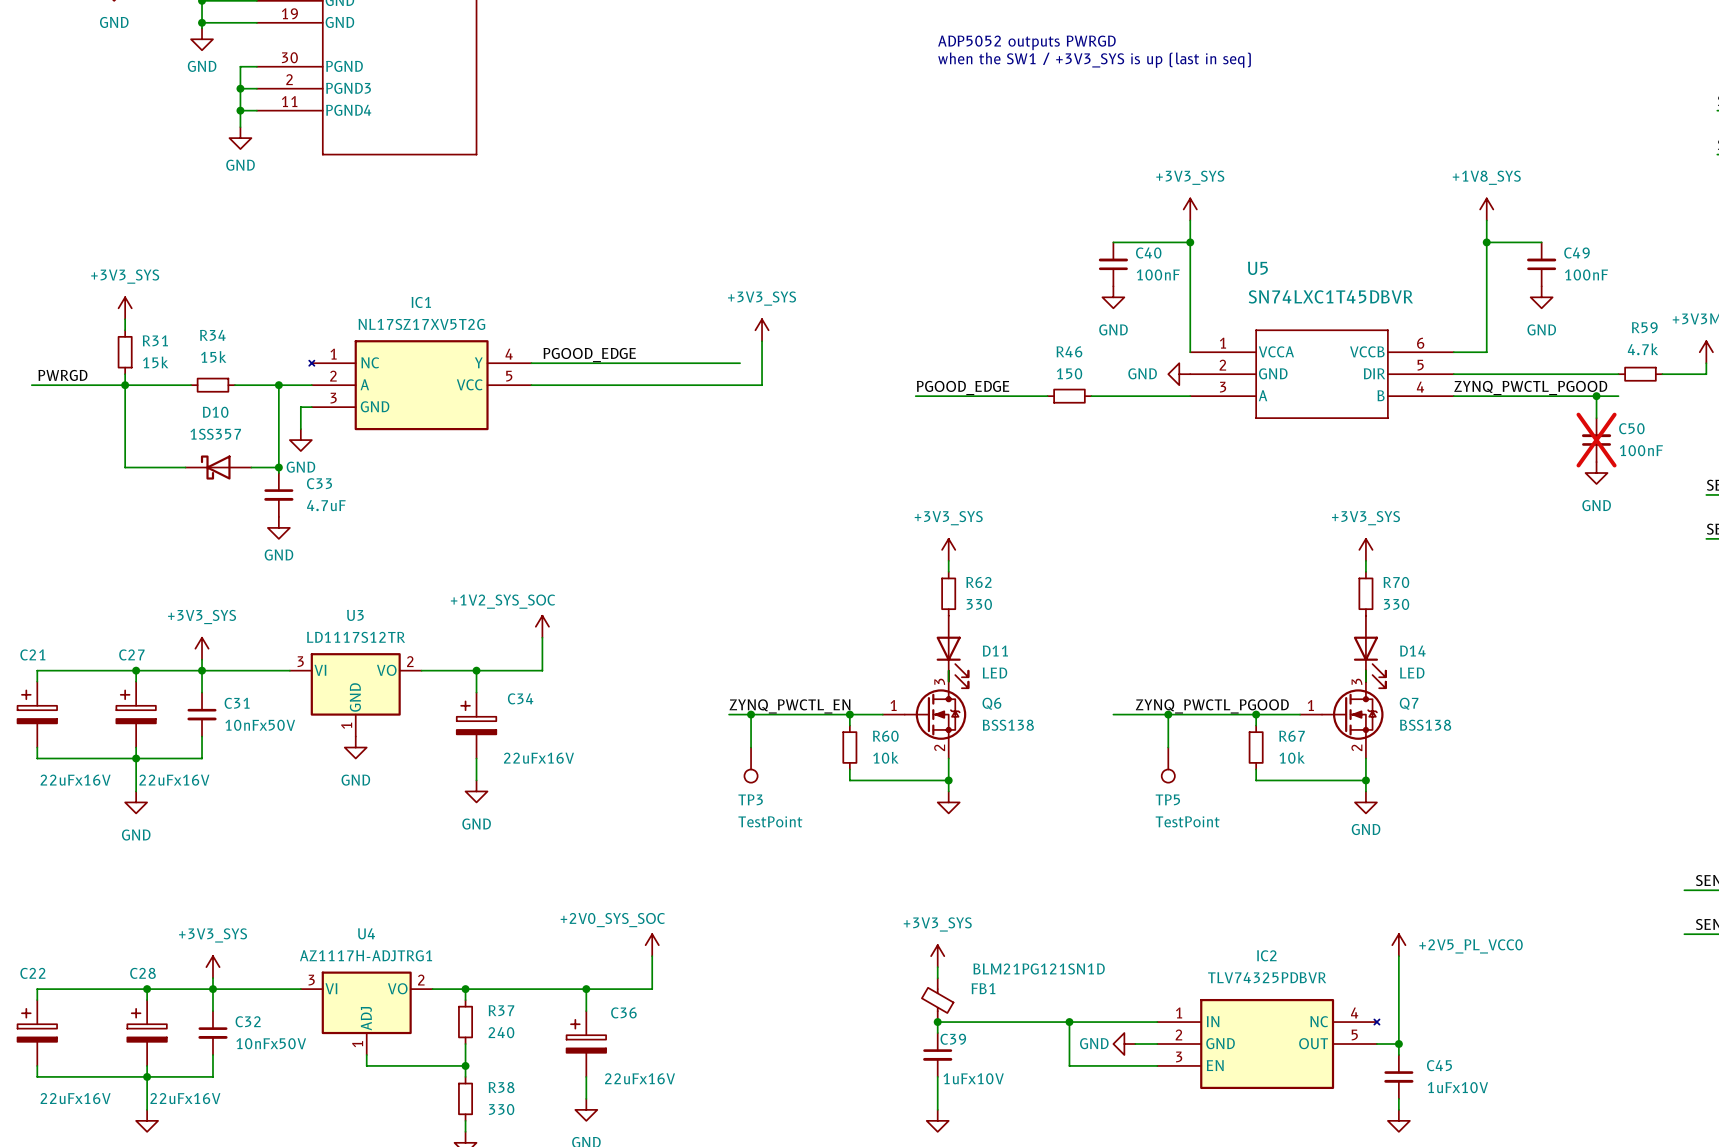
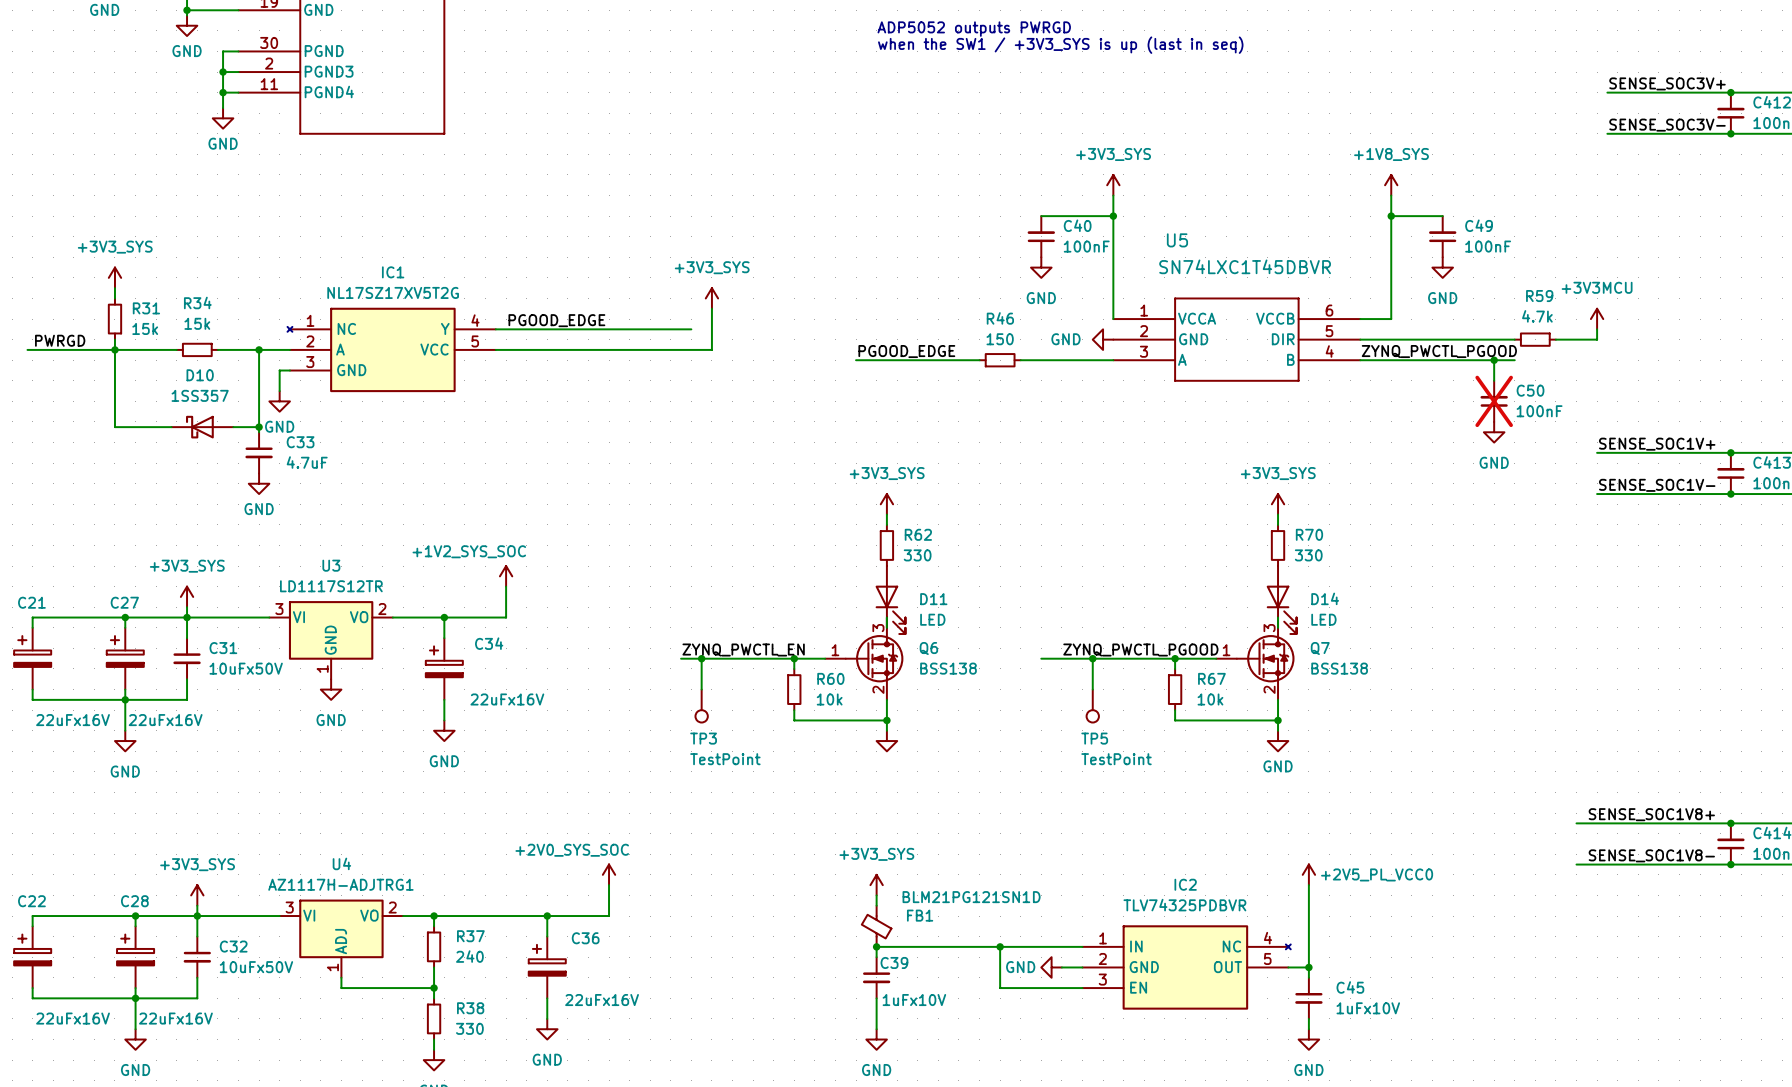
C31 value: 10nFx50V (260, 725) -> 10uFx50V (246, 668)
C32 value: 10nFx50V (271, 1043) -> 10uFx50V (256, 967)

